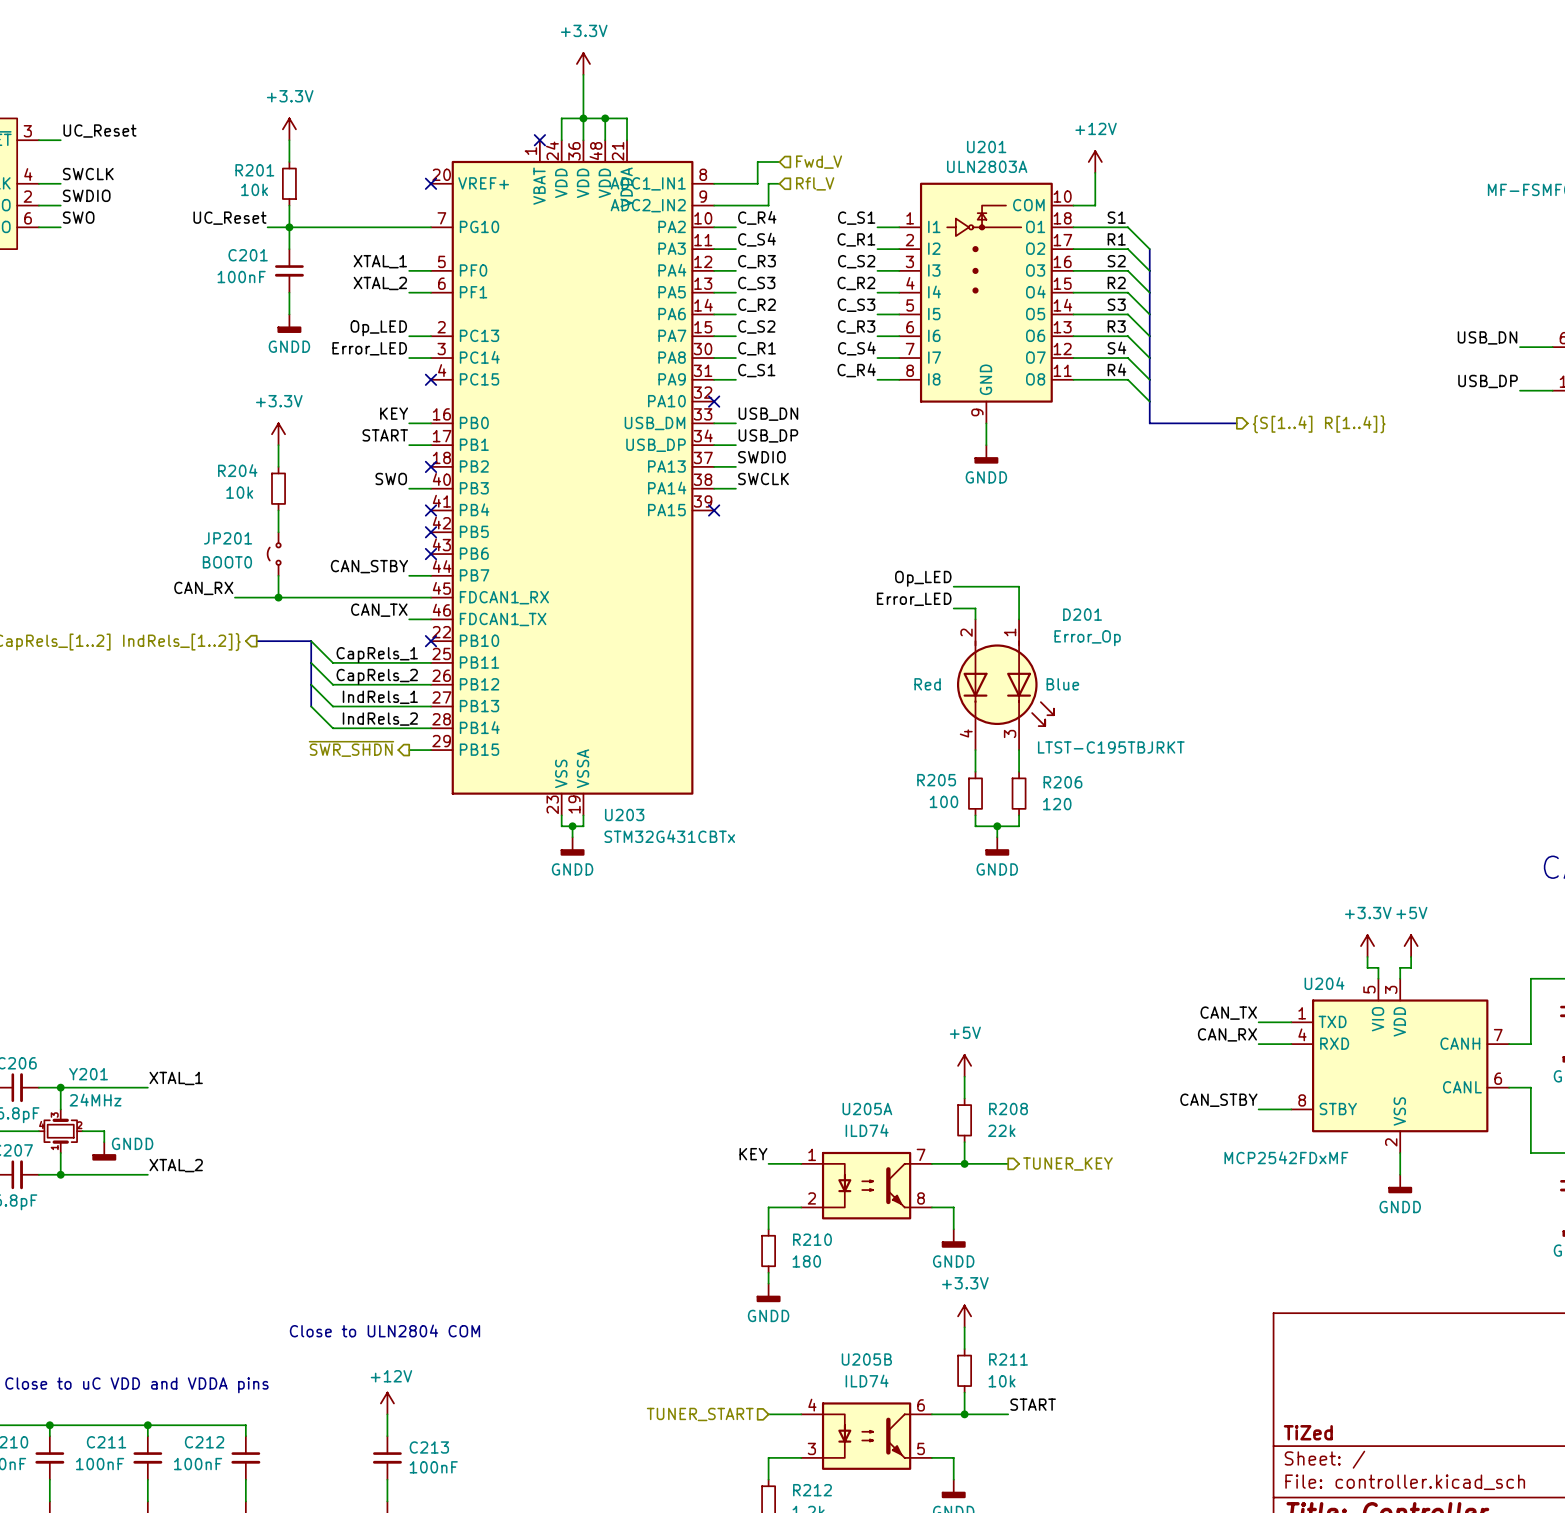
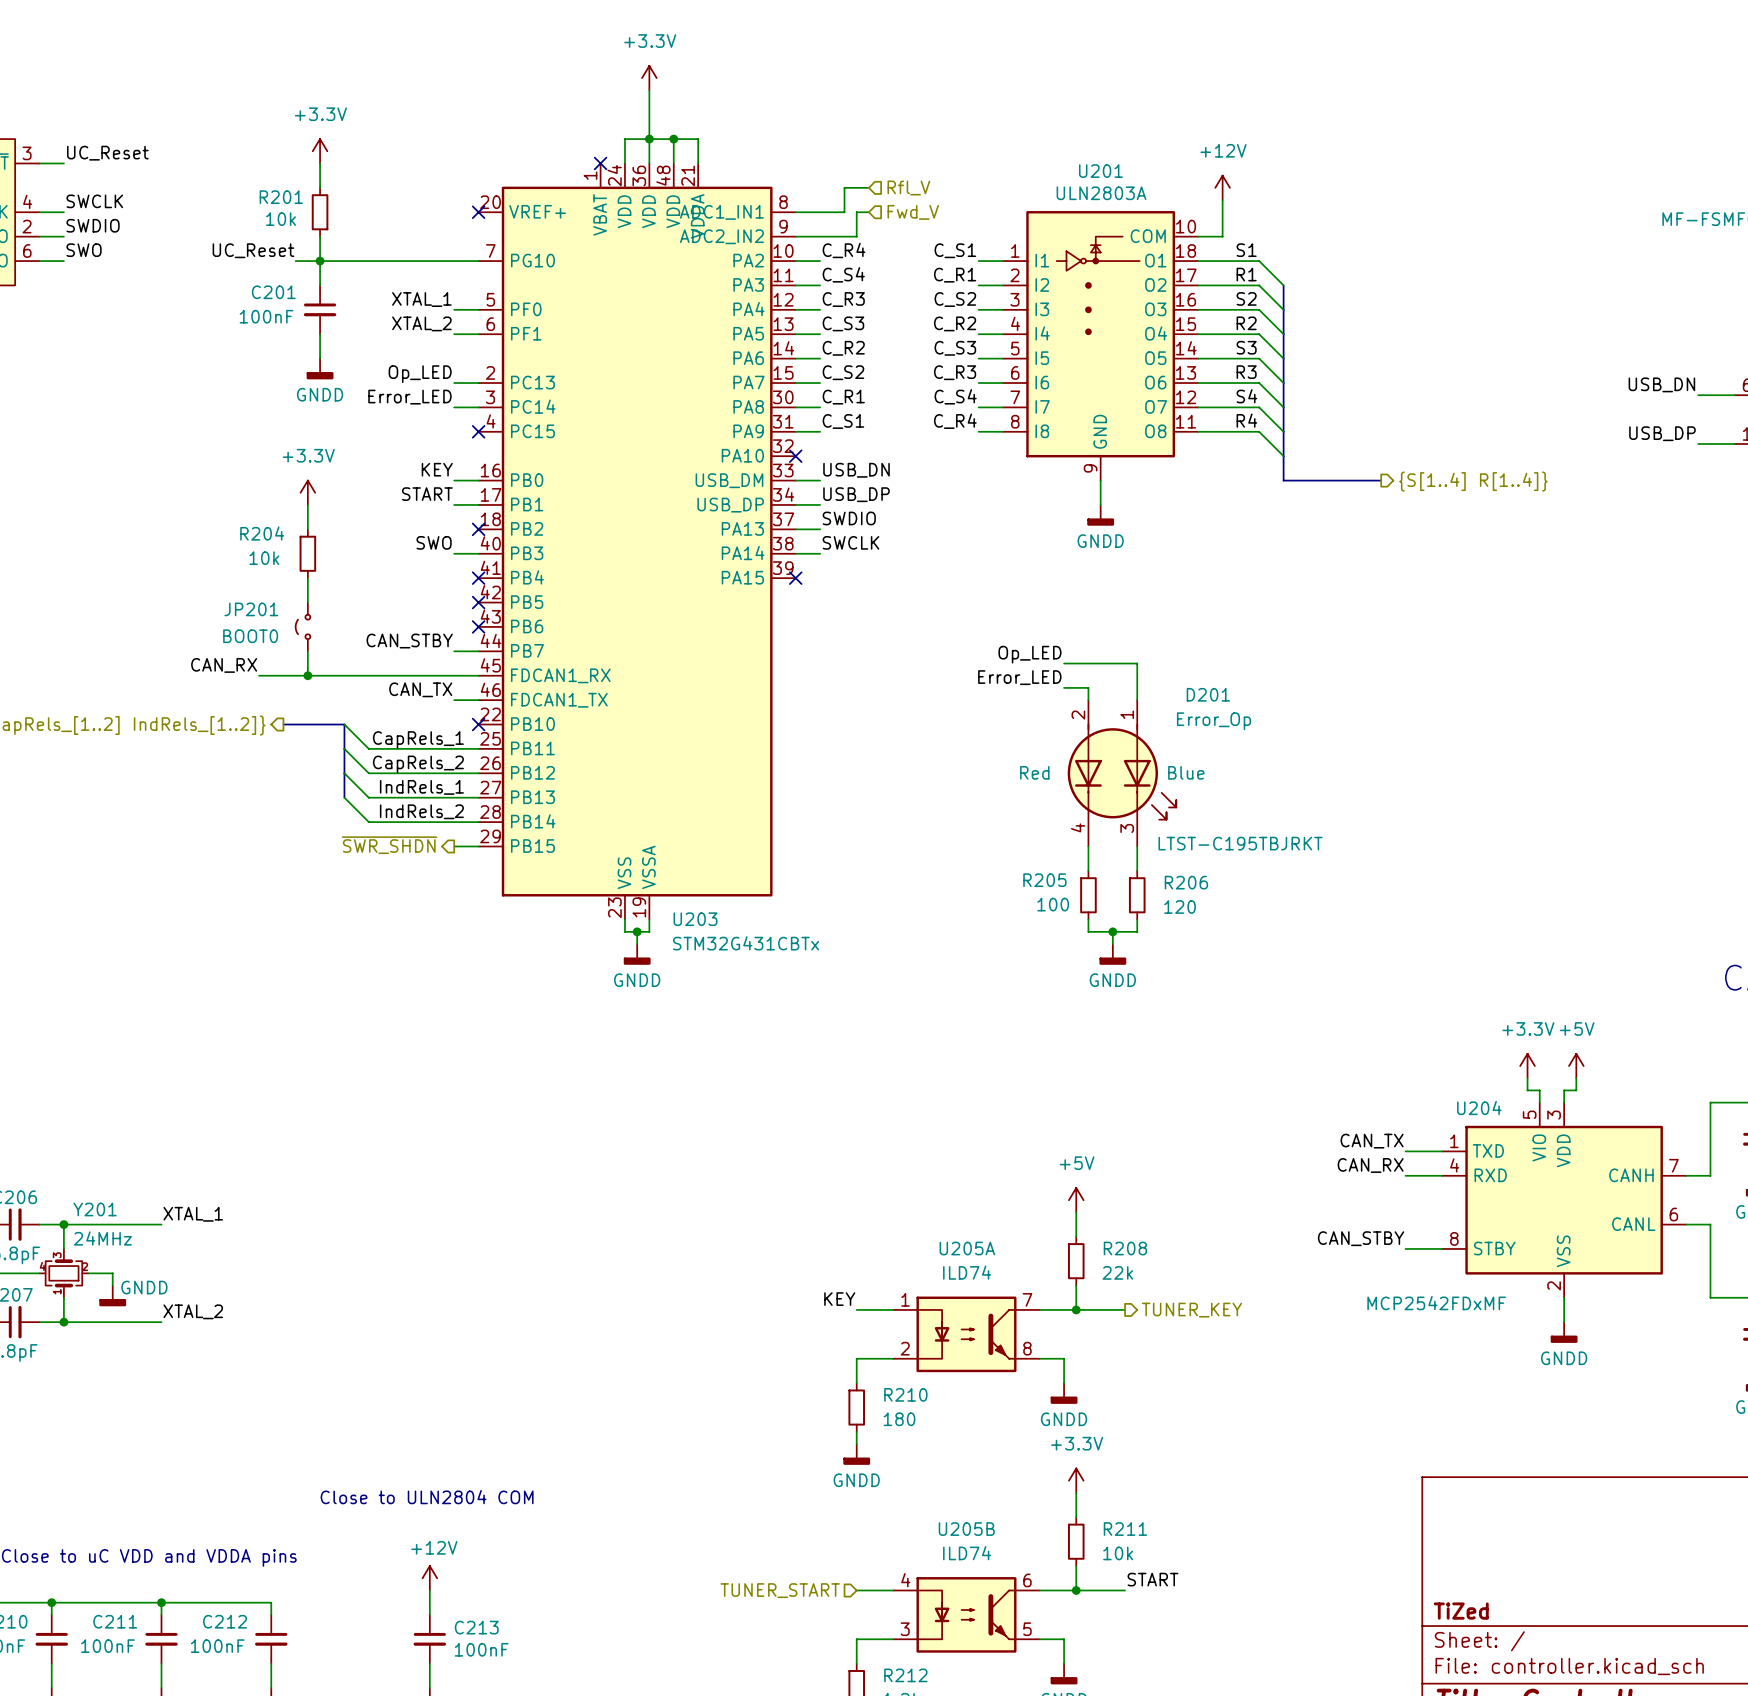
hierarchical label: Fwd_V (819, 162) -> Rfl_V (908, 187)
hierarchical label: Rfl_V (815, 183) -> Fwd_V (913, 212)

